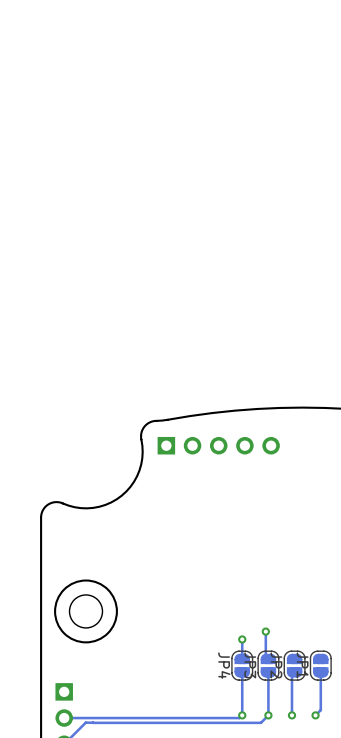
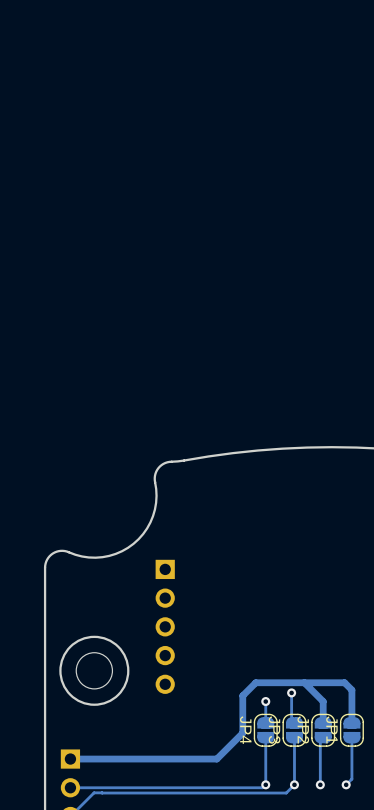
part rotation: 0° (218, 445) -> 90° clockwise (165, 626)
part position: (218, 445) -> (165, 626)
track: none -> (304, 682) (323, 701) (323, 722)
track: none -> (351, 722) (351, 690) (344, 682) (255, 682) (242, 695) (242, 733) (216, 759) (70, 759)

